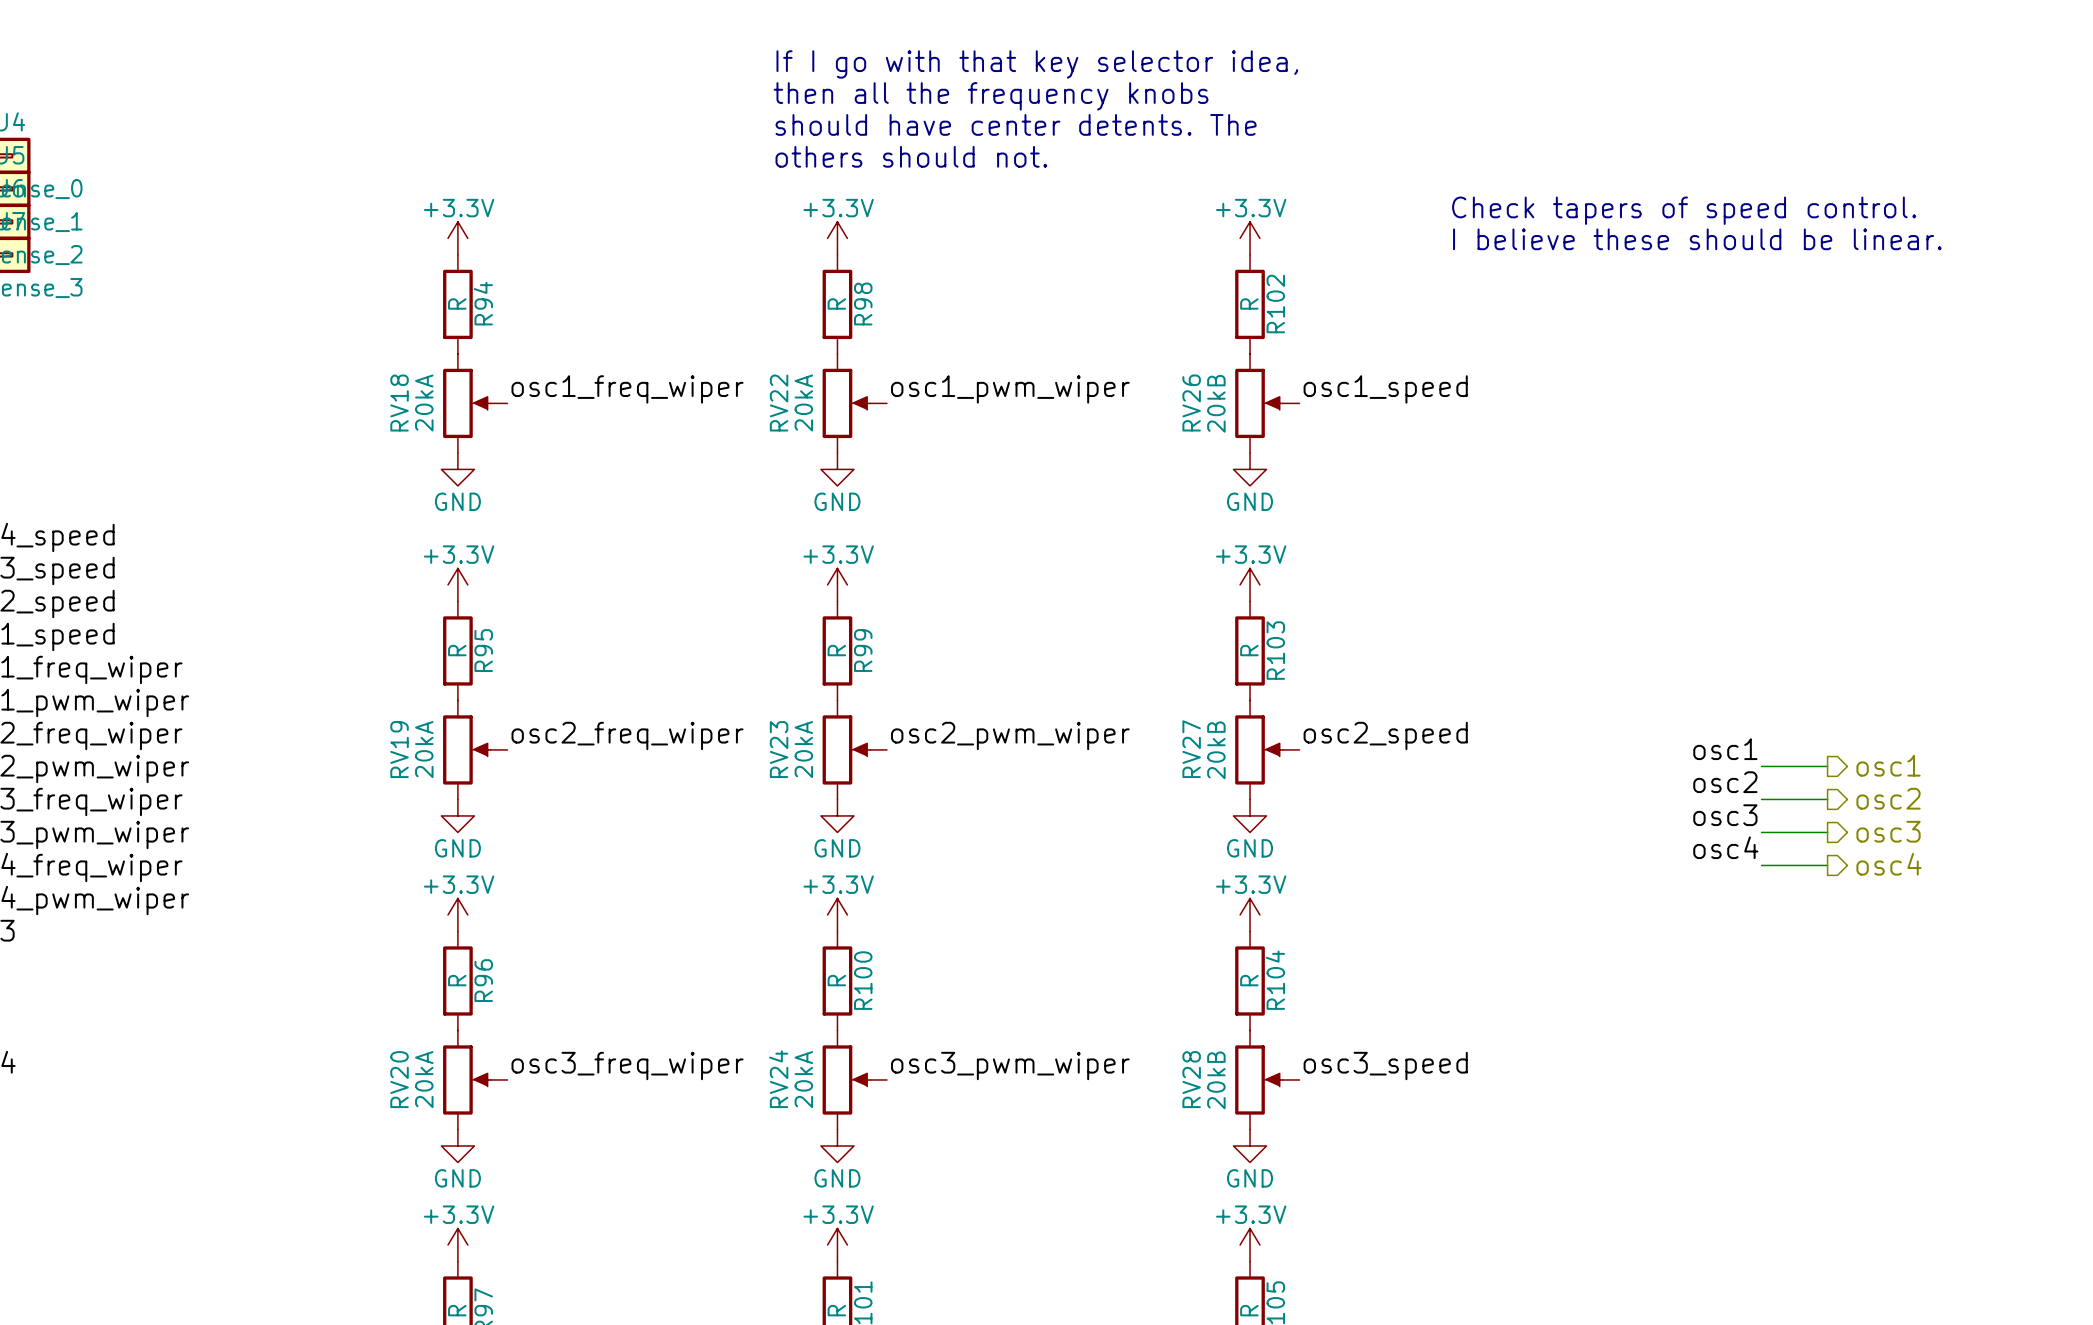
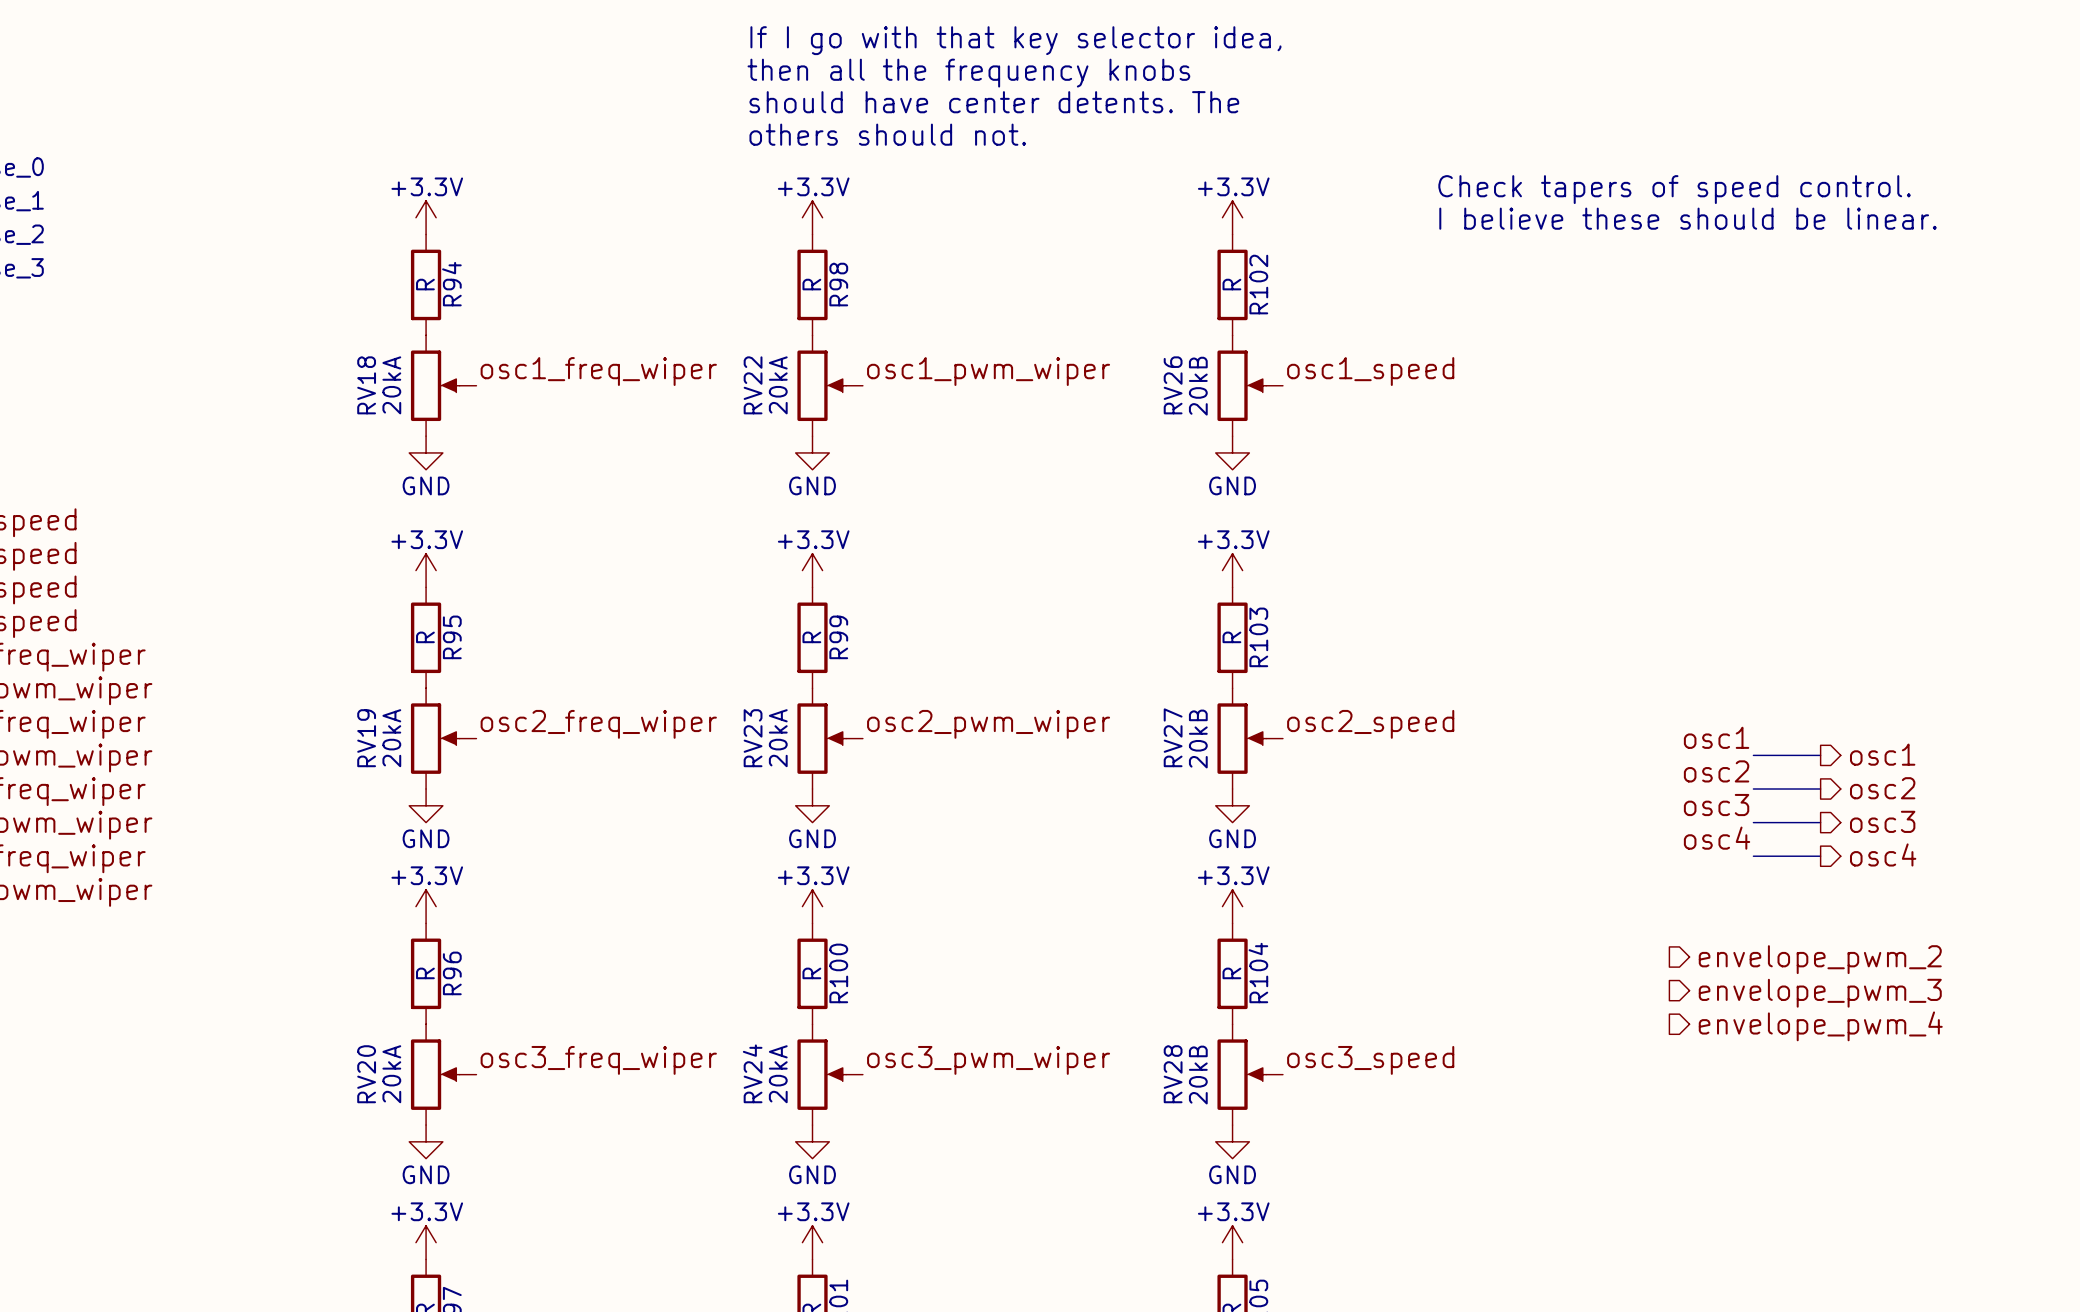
hierarchical label: none -> envelope_pwm_2 (1820, 959)
hierarchical label: none -> envelope_pwm_3 (1820, 993)
hierarchical label: none -> envelope_pwm_4 (1820, 1026)

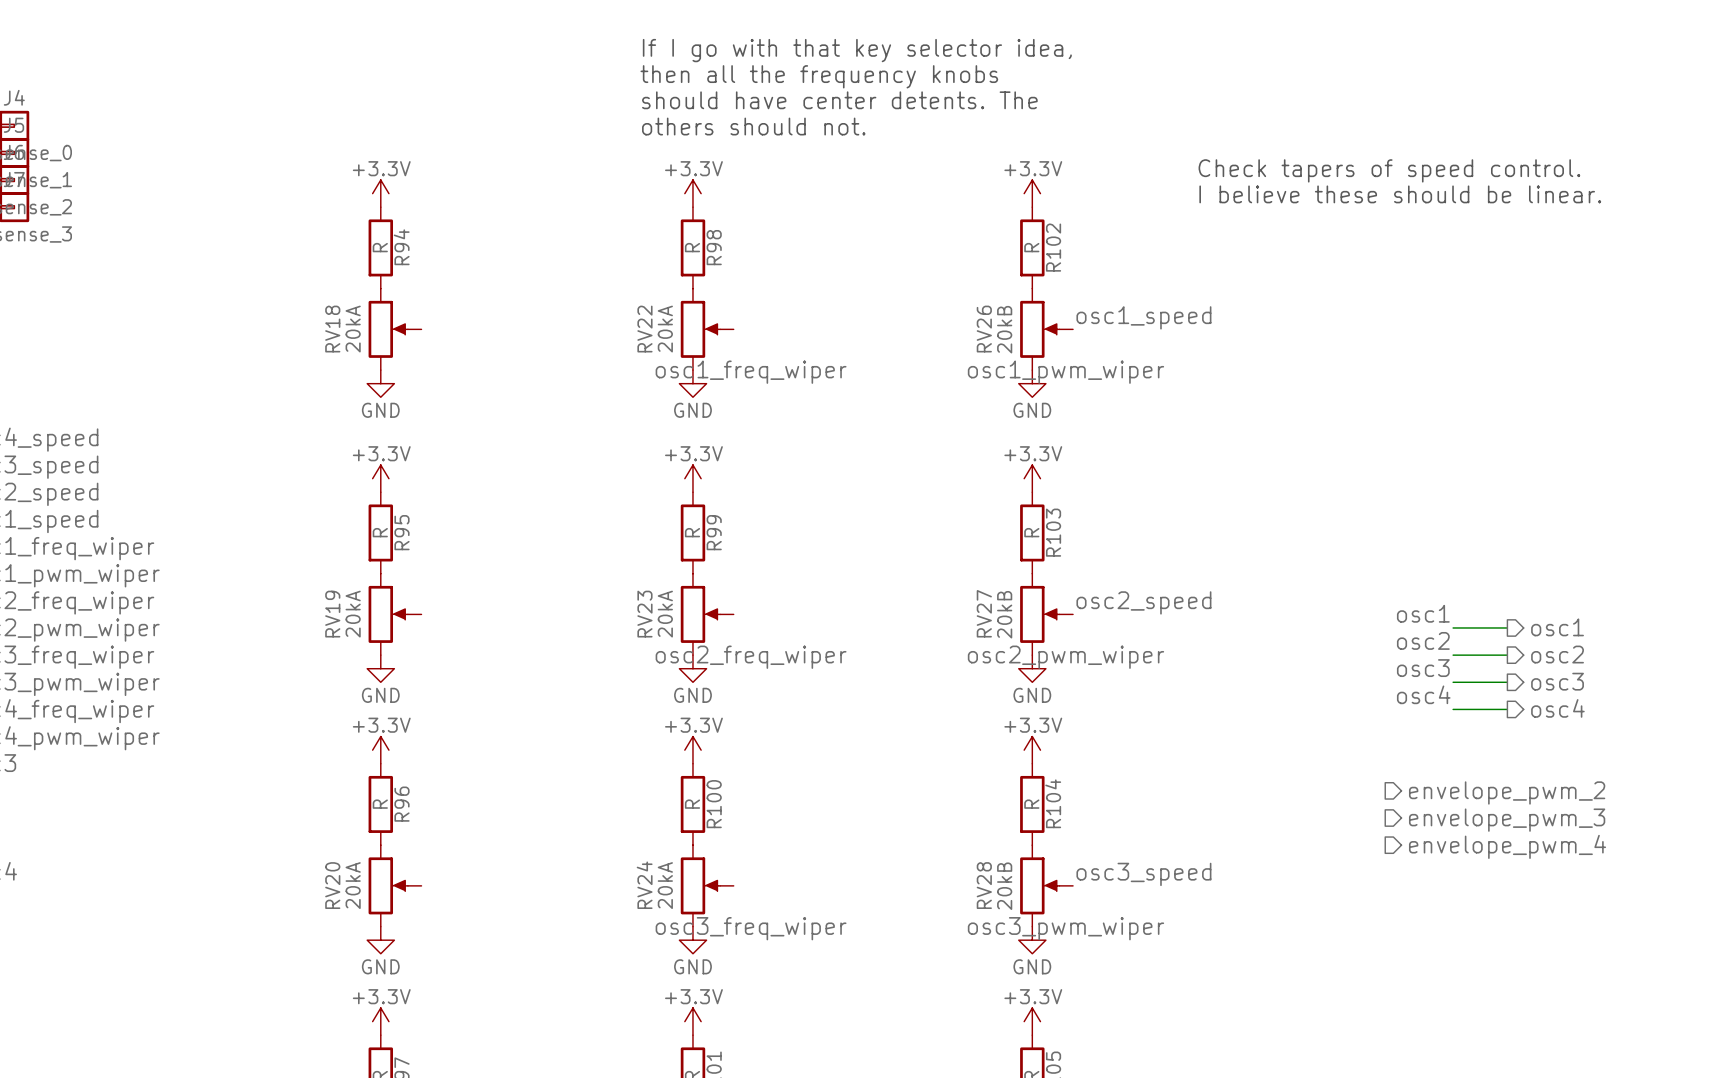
label position: osc1_freq_wiper (598, 371) -> osc1_freq_wiper (751, 372)
label position: osc1_pwm_wiper (988, 371) -> osc1_pwm_wiper (1065, 372)
label position: osc2_freq_wiper (598, 724) -> osc2_freq_wiper (751, 657)
label position: osc2_pwm_wiper (988, 724) -> osc2_pwm_wiper (1065, 657)
label position: osc3_freq_wiper (598, 1060) -> osc3_freq_wiper (751, 928)
label position: osc3_pwm_wiper (988, 1060) -> osc3_pwm_wiper (1065, 928)

